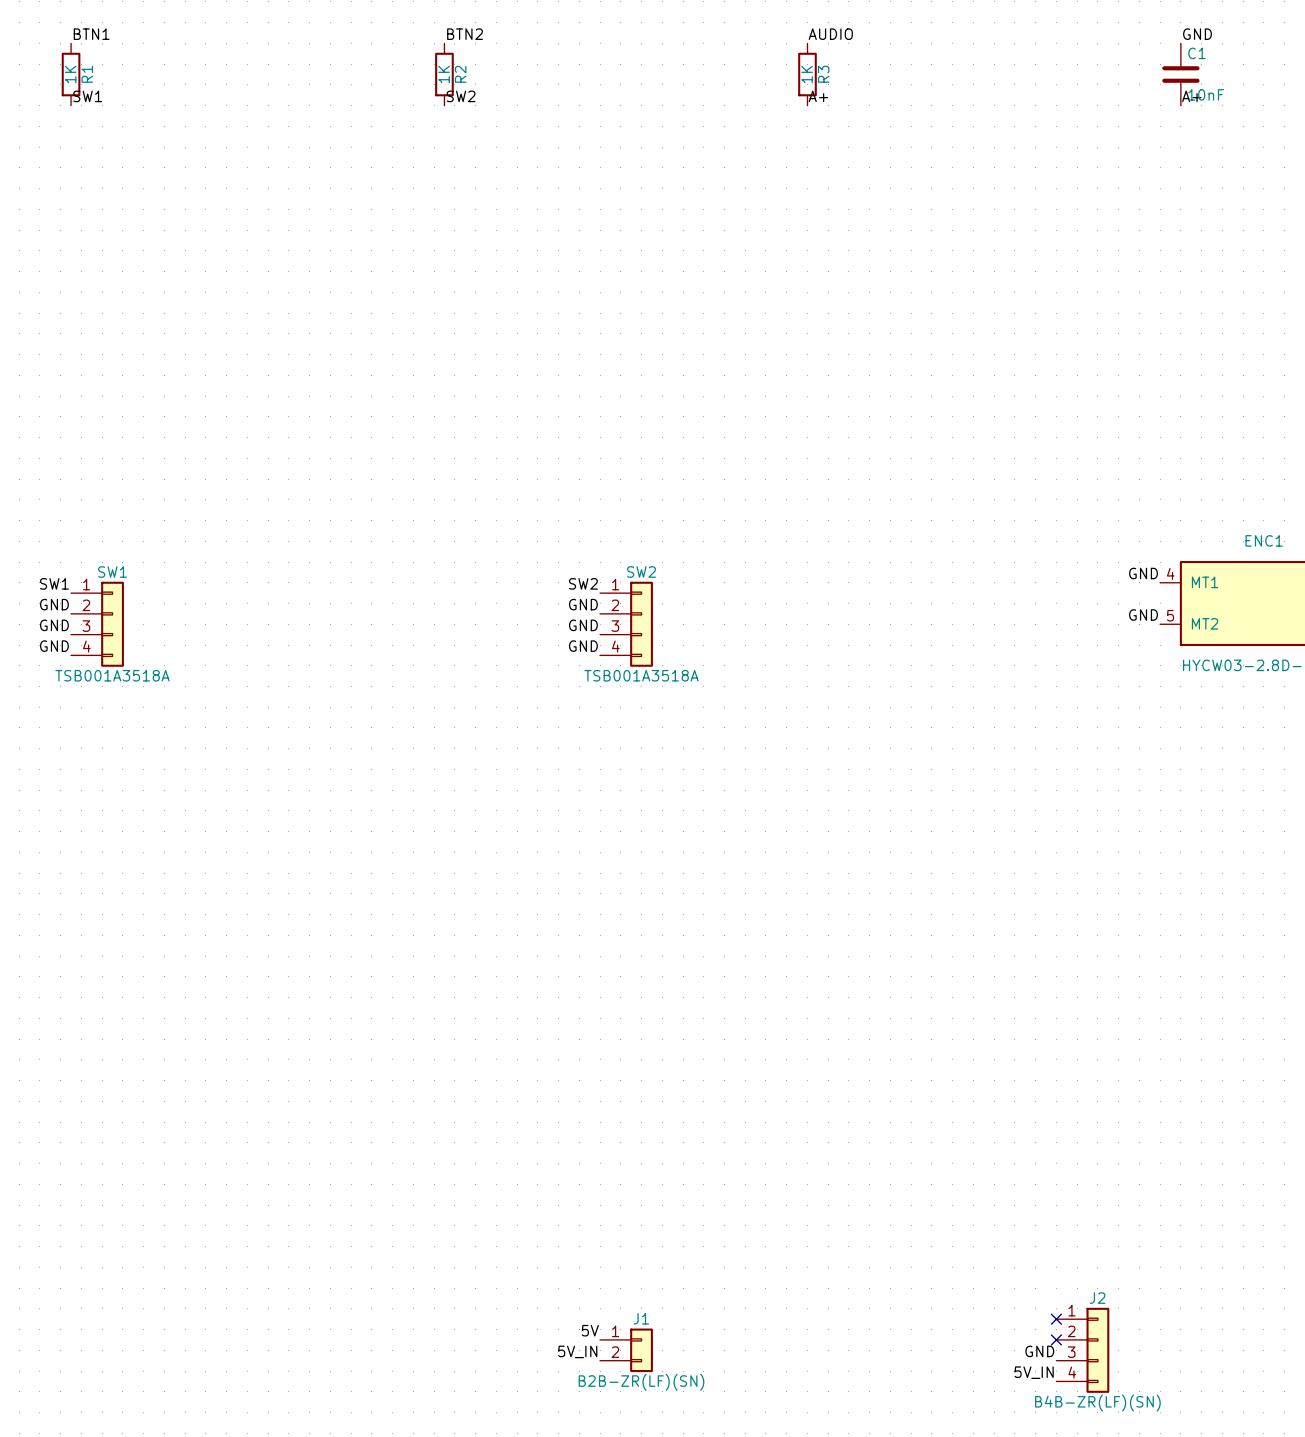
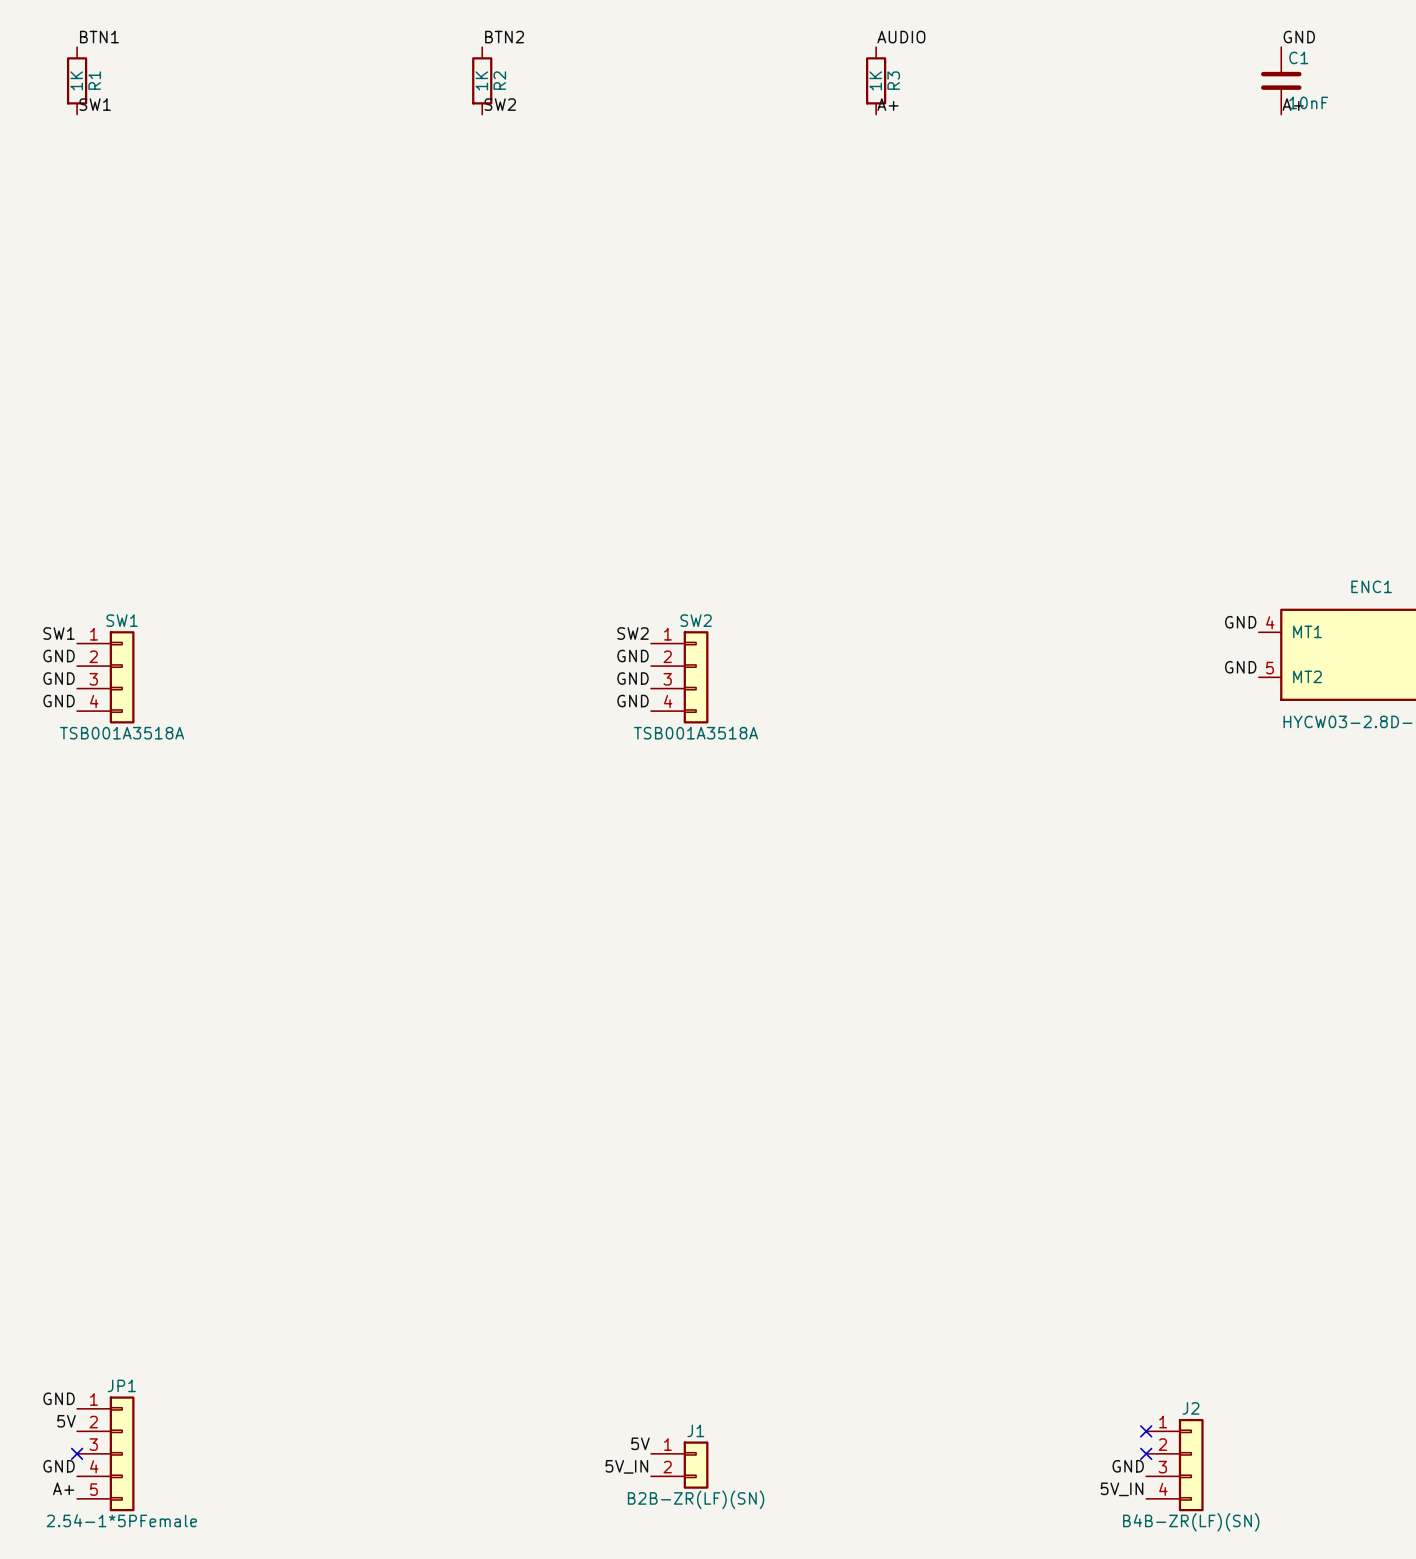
label: none -> GND (59, 1398)
label: none -> 5V (66, 1421)
no-connect mark: none -> (77, 1453)
JP1: none -> 2.54-1*5PFemale (105, 1453)
label: none -> GND (59, 1466)
label: none -> A+ (63, 1488)

